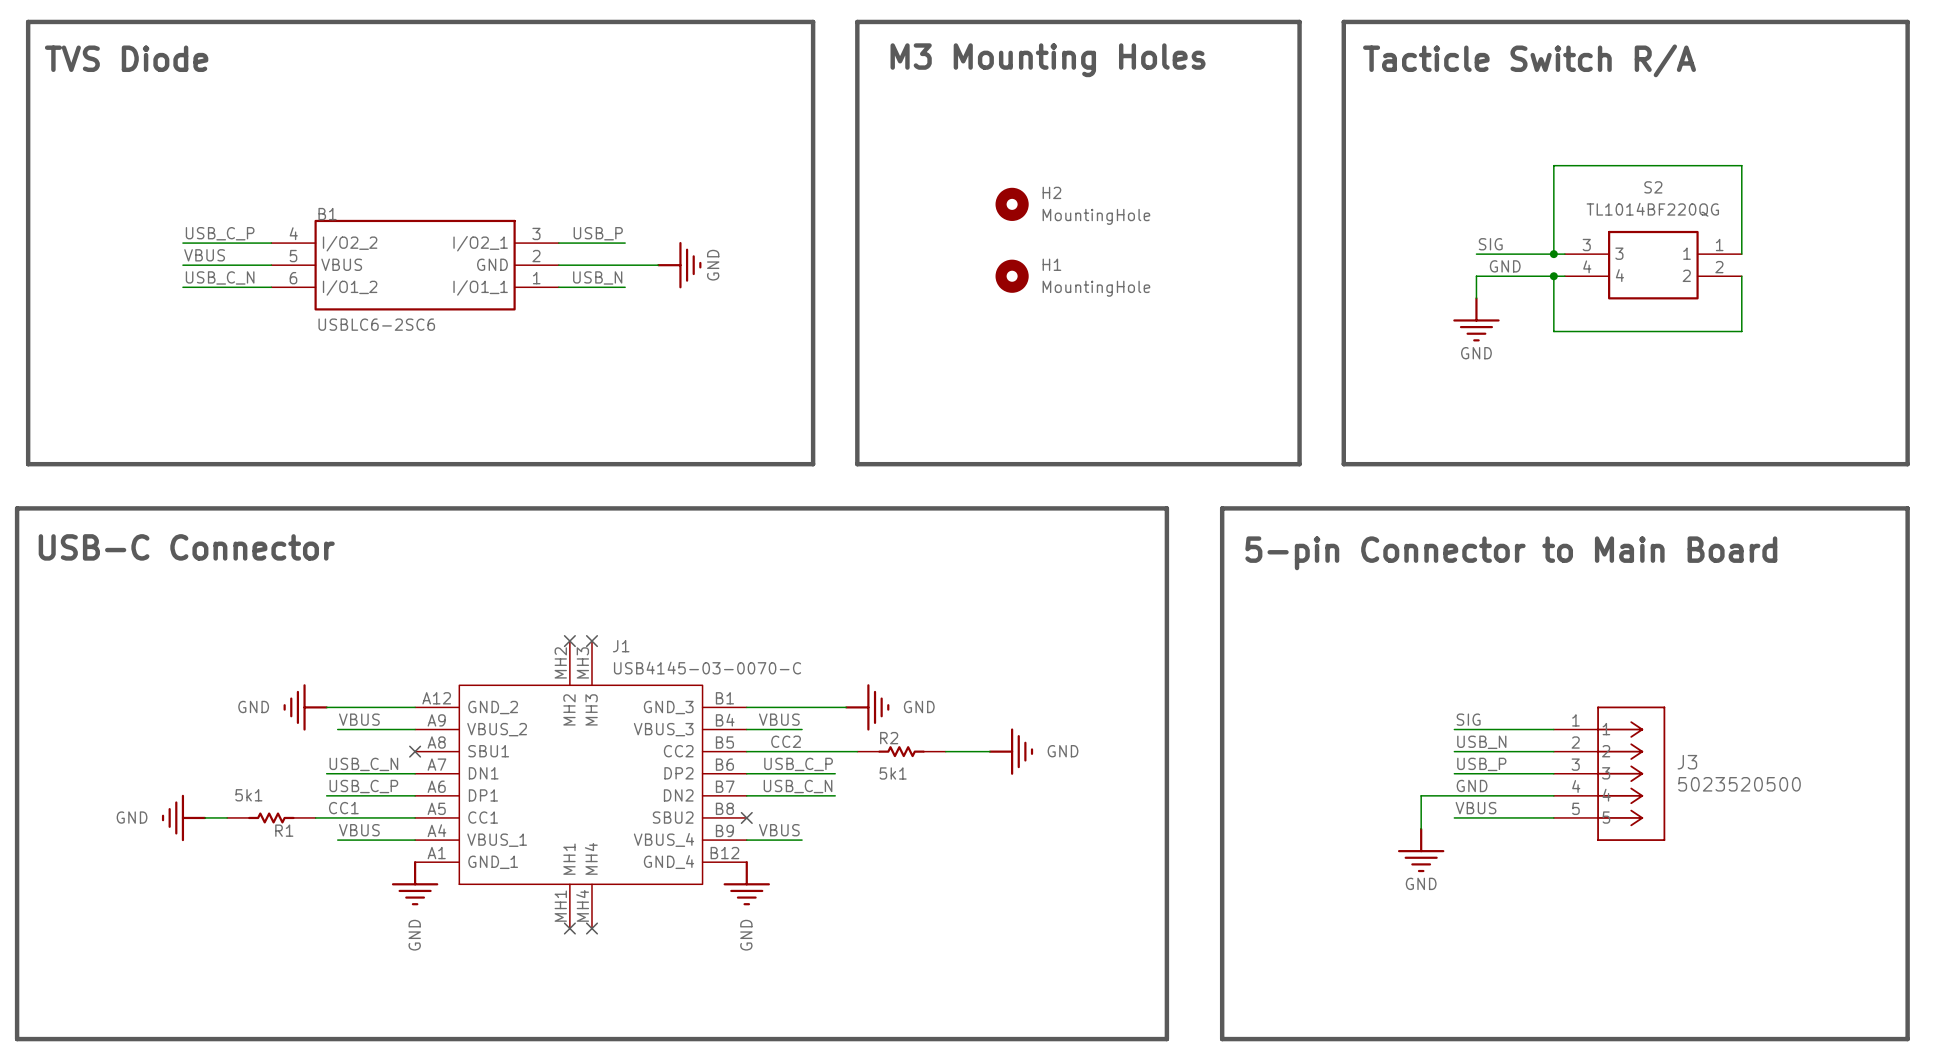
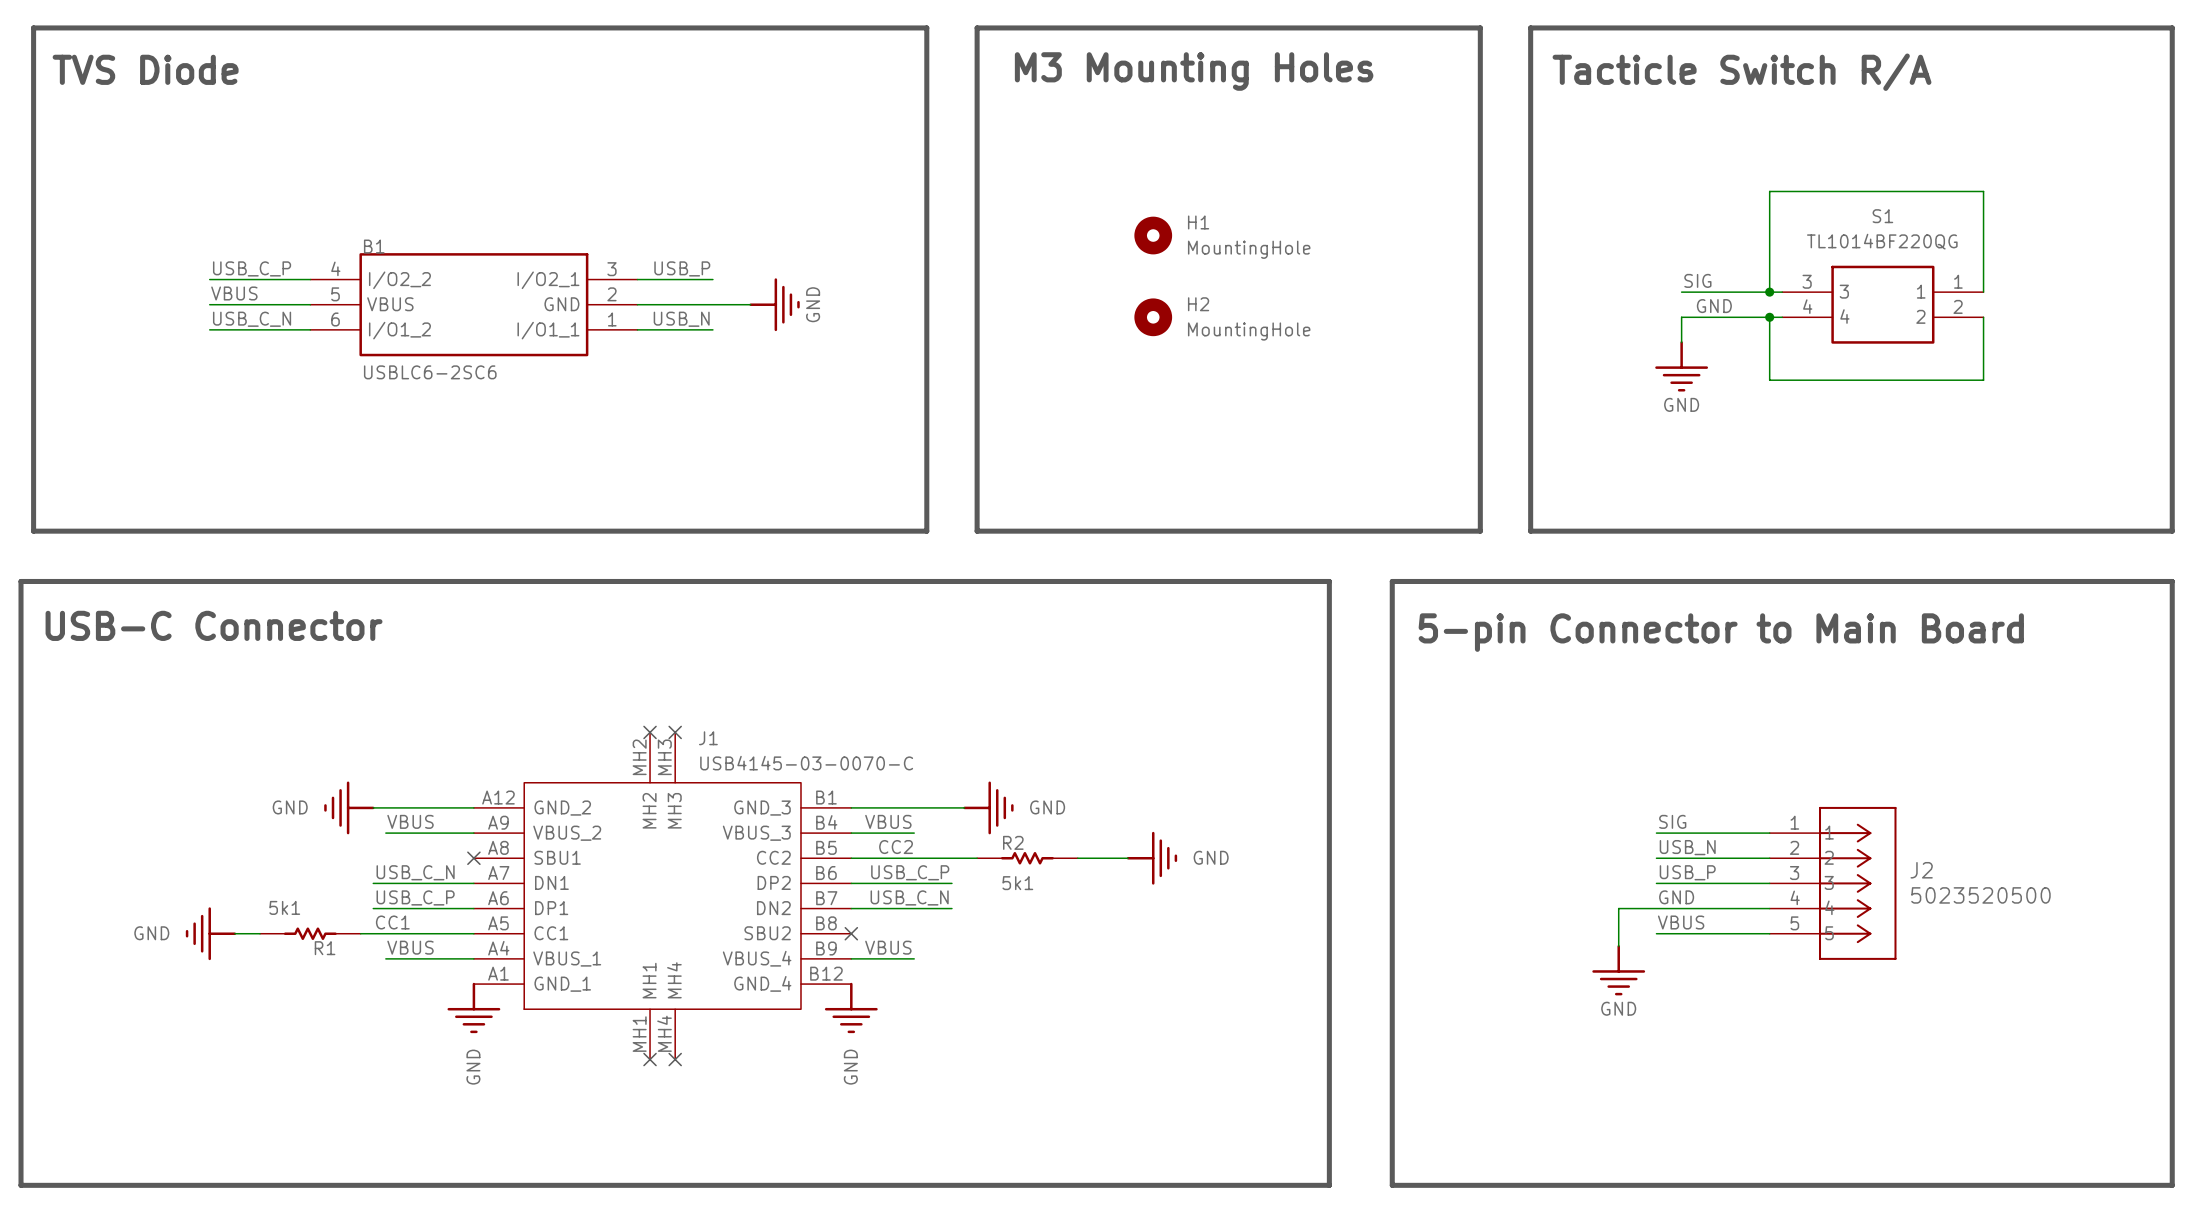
S2 name: S2 (1653, 187) -> S1 (1882, 216)
H2 name: H2 (1051, 192) -> H1 (1198, 222)
H1 name: H1 (1051, 264) -> H2 (1198, 304)
J3 name: J3 (1687, 762) -> J2 (1921, 870)

